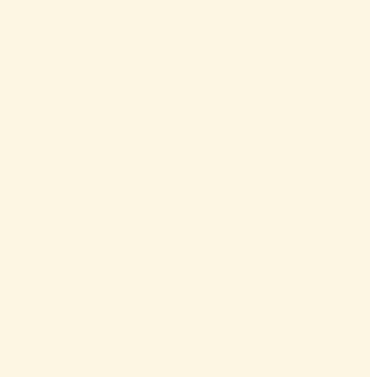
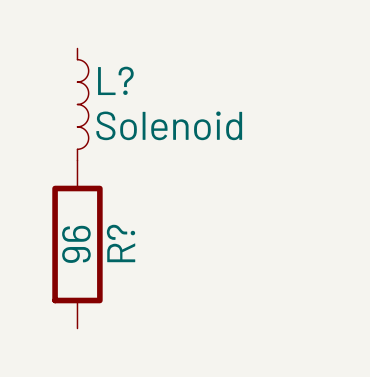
L?: none -> Solenoid (83, 104)
R?: none -> 96 (77, 244)

